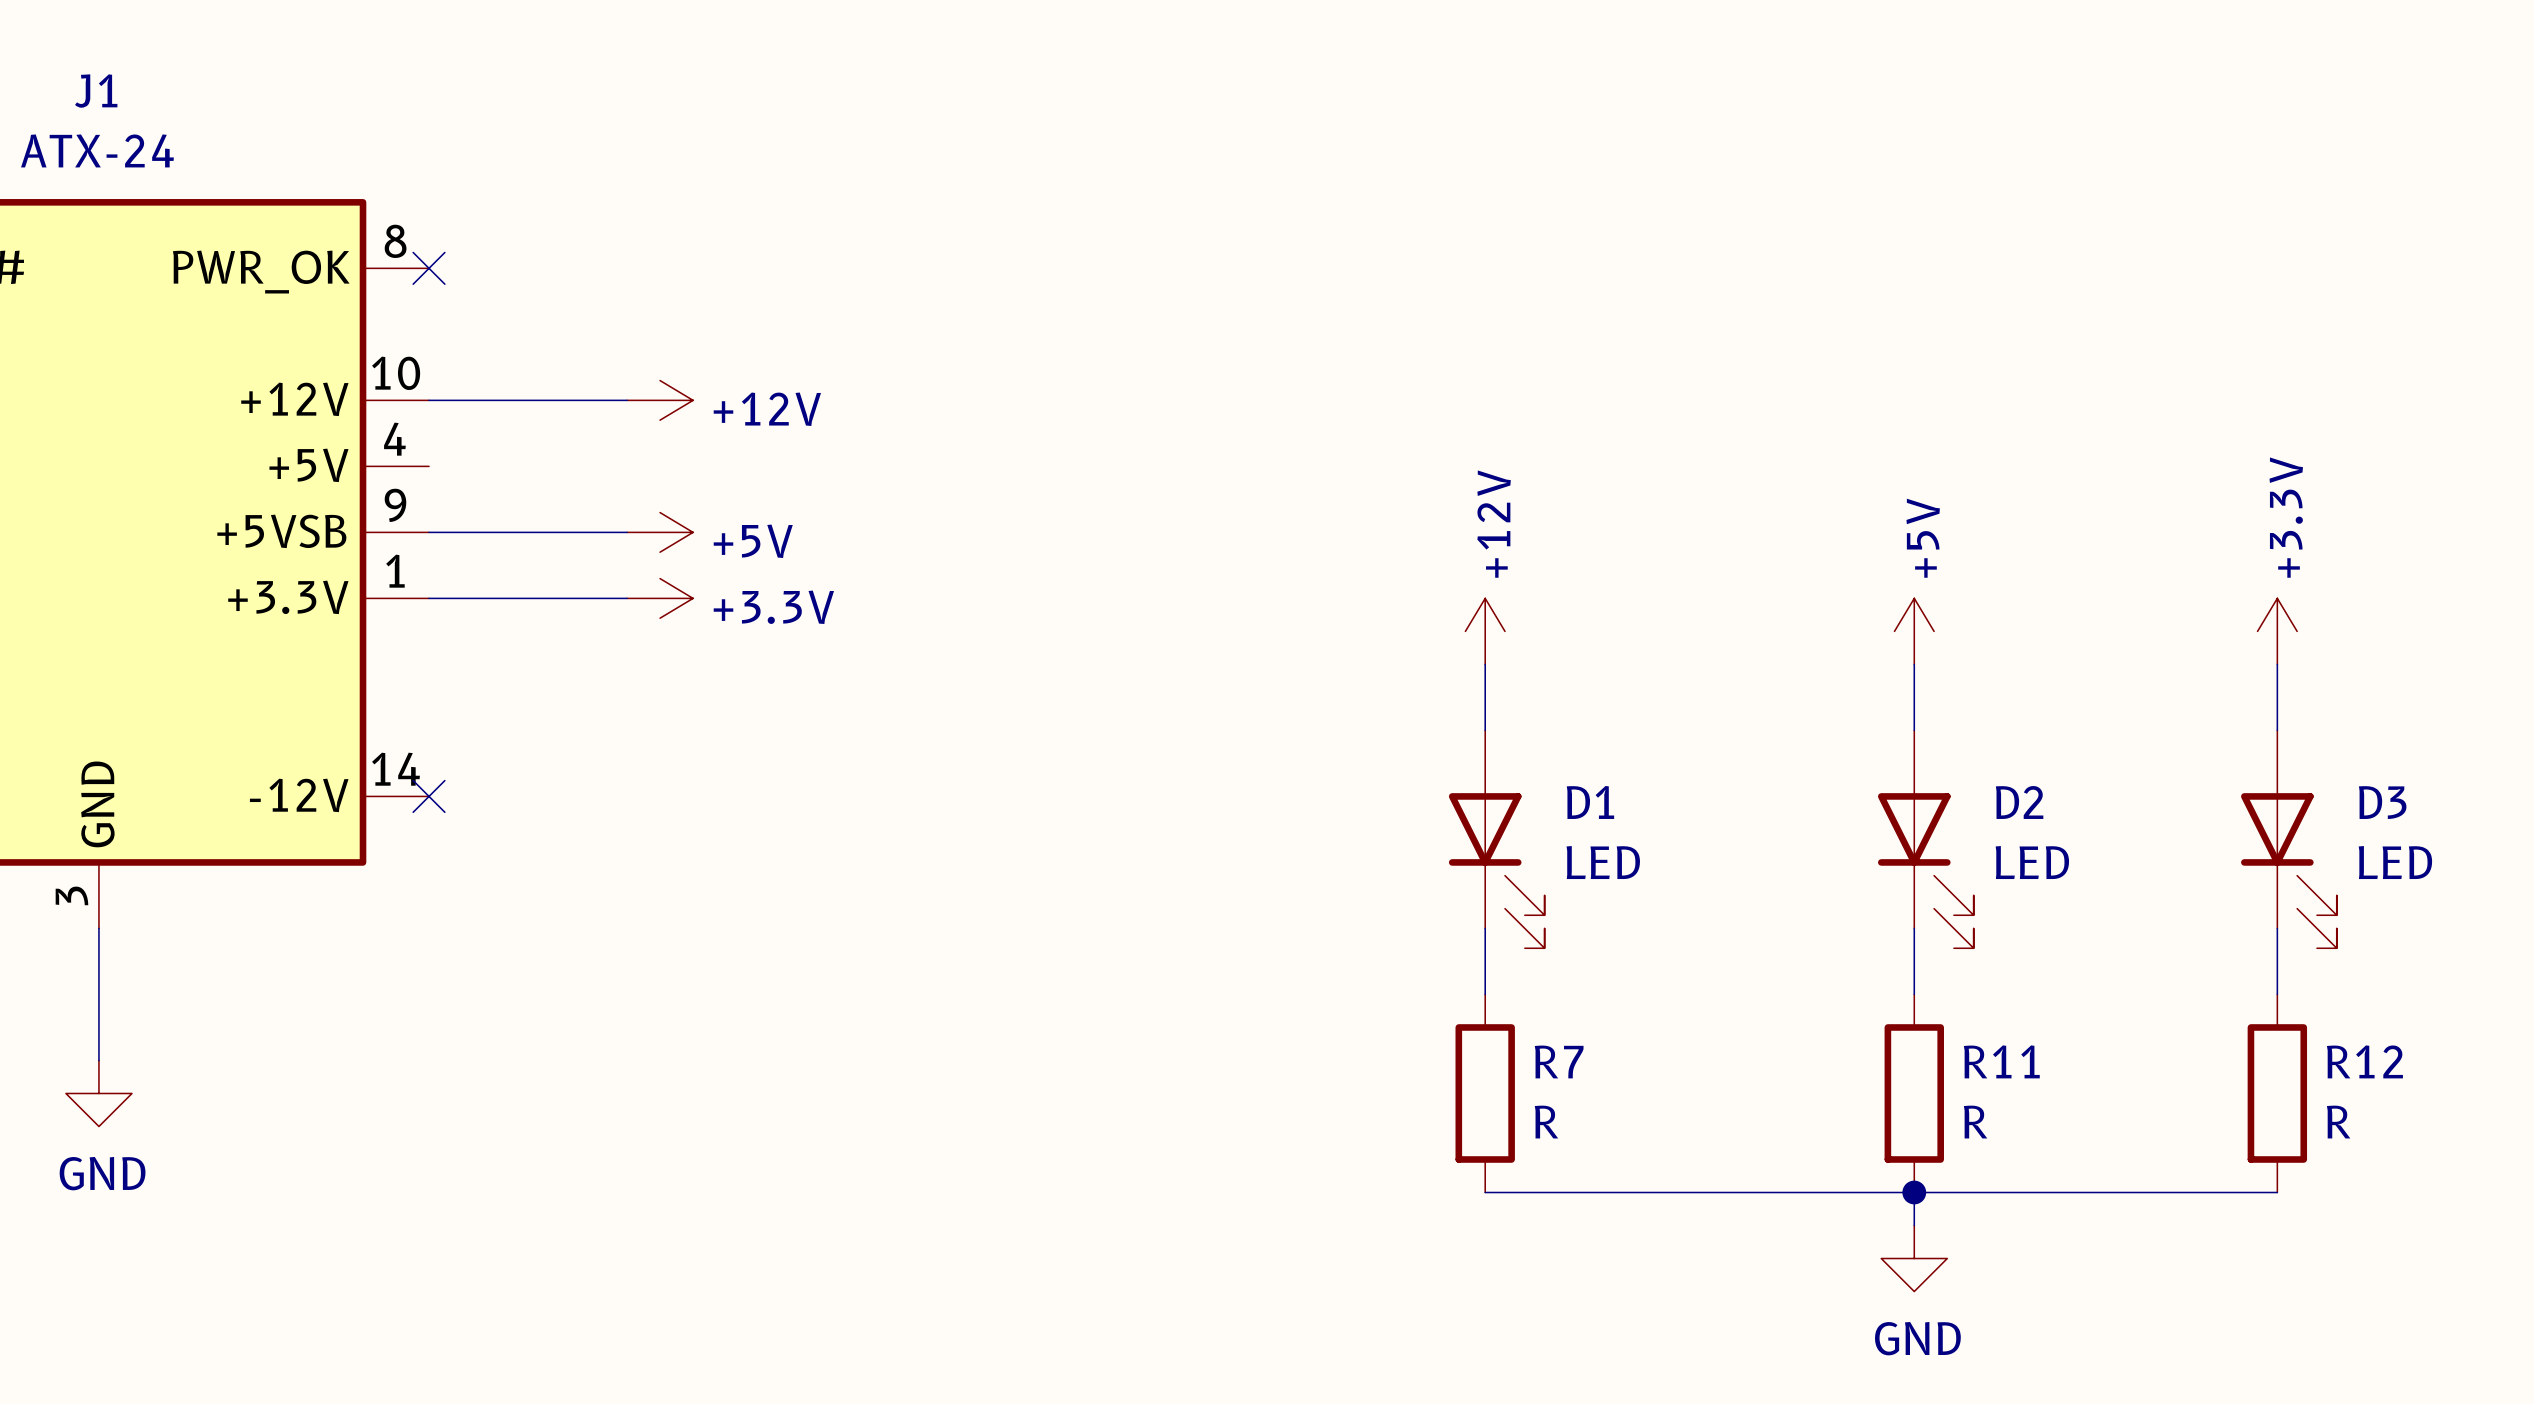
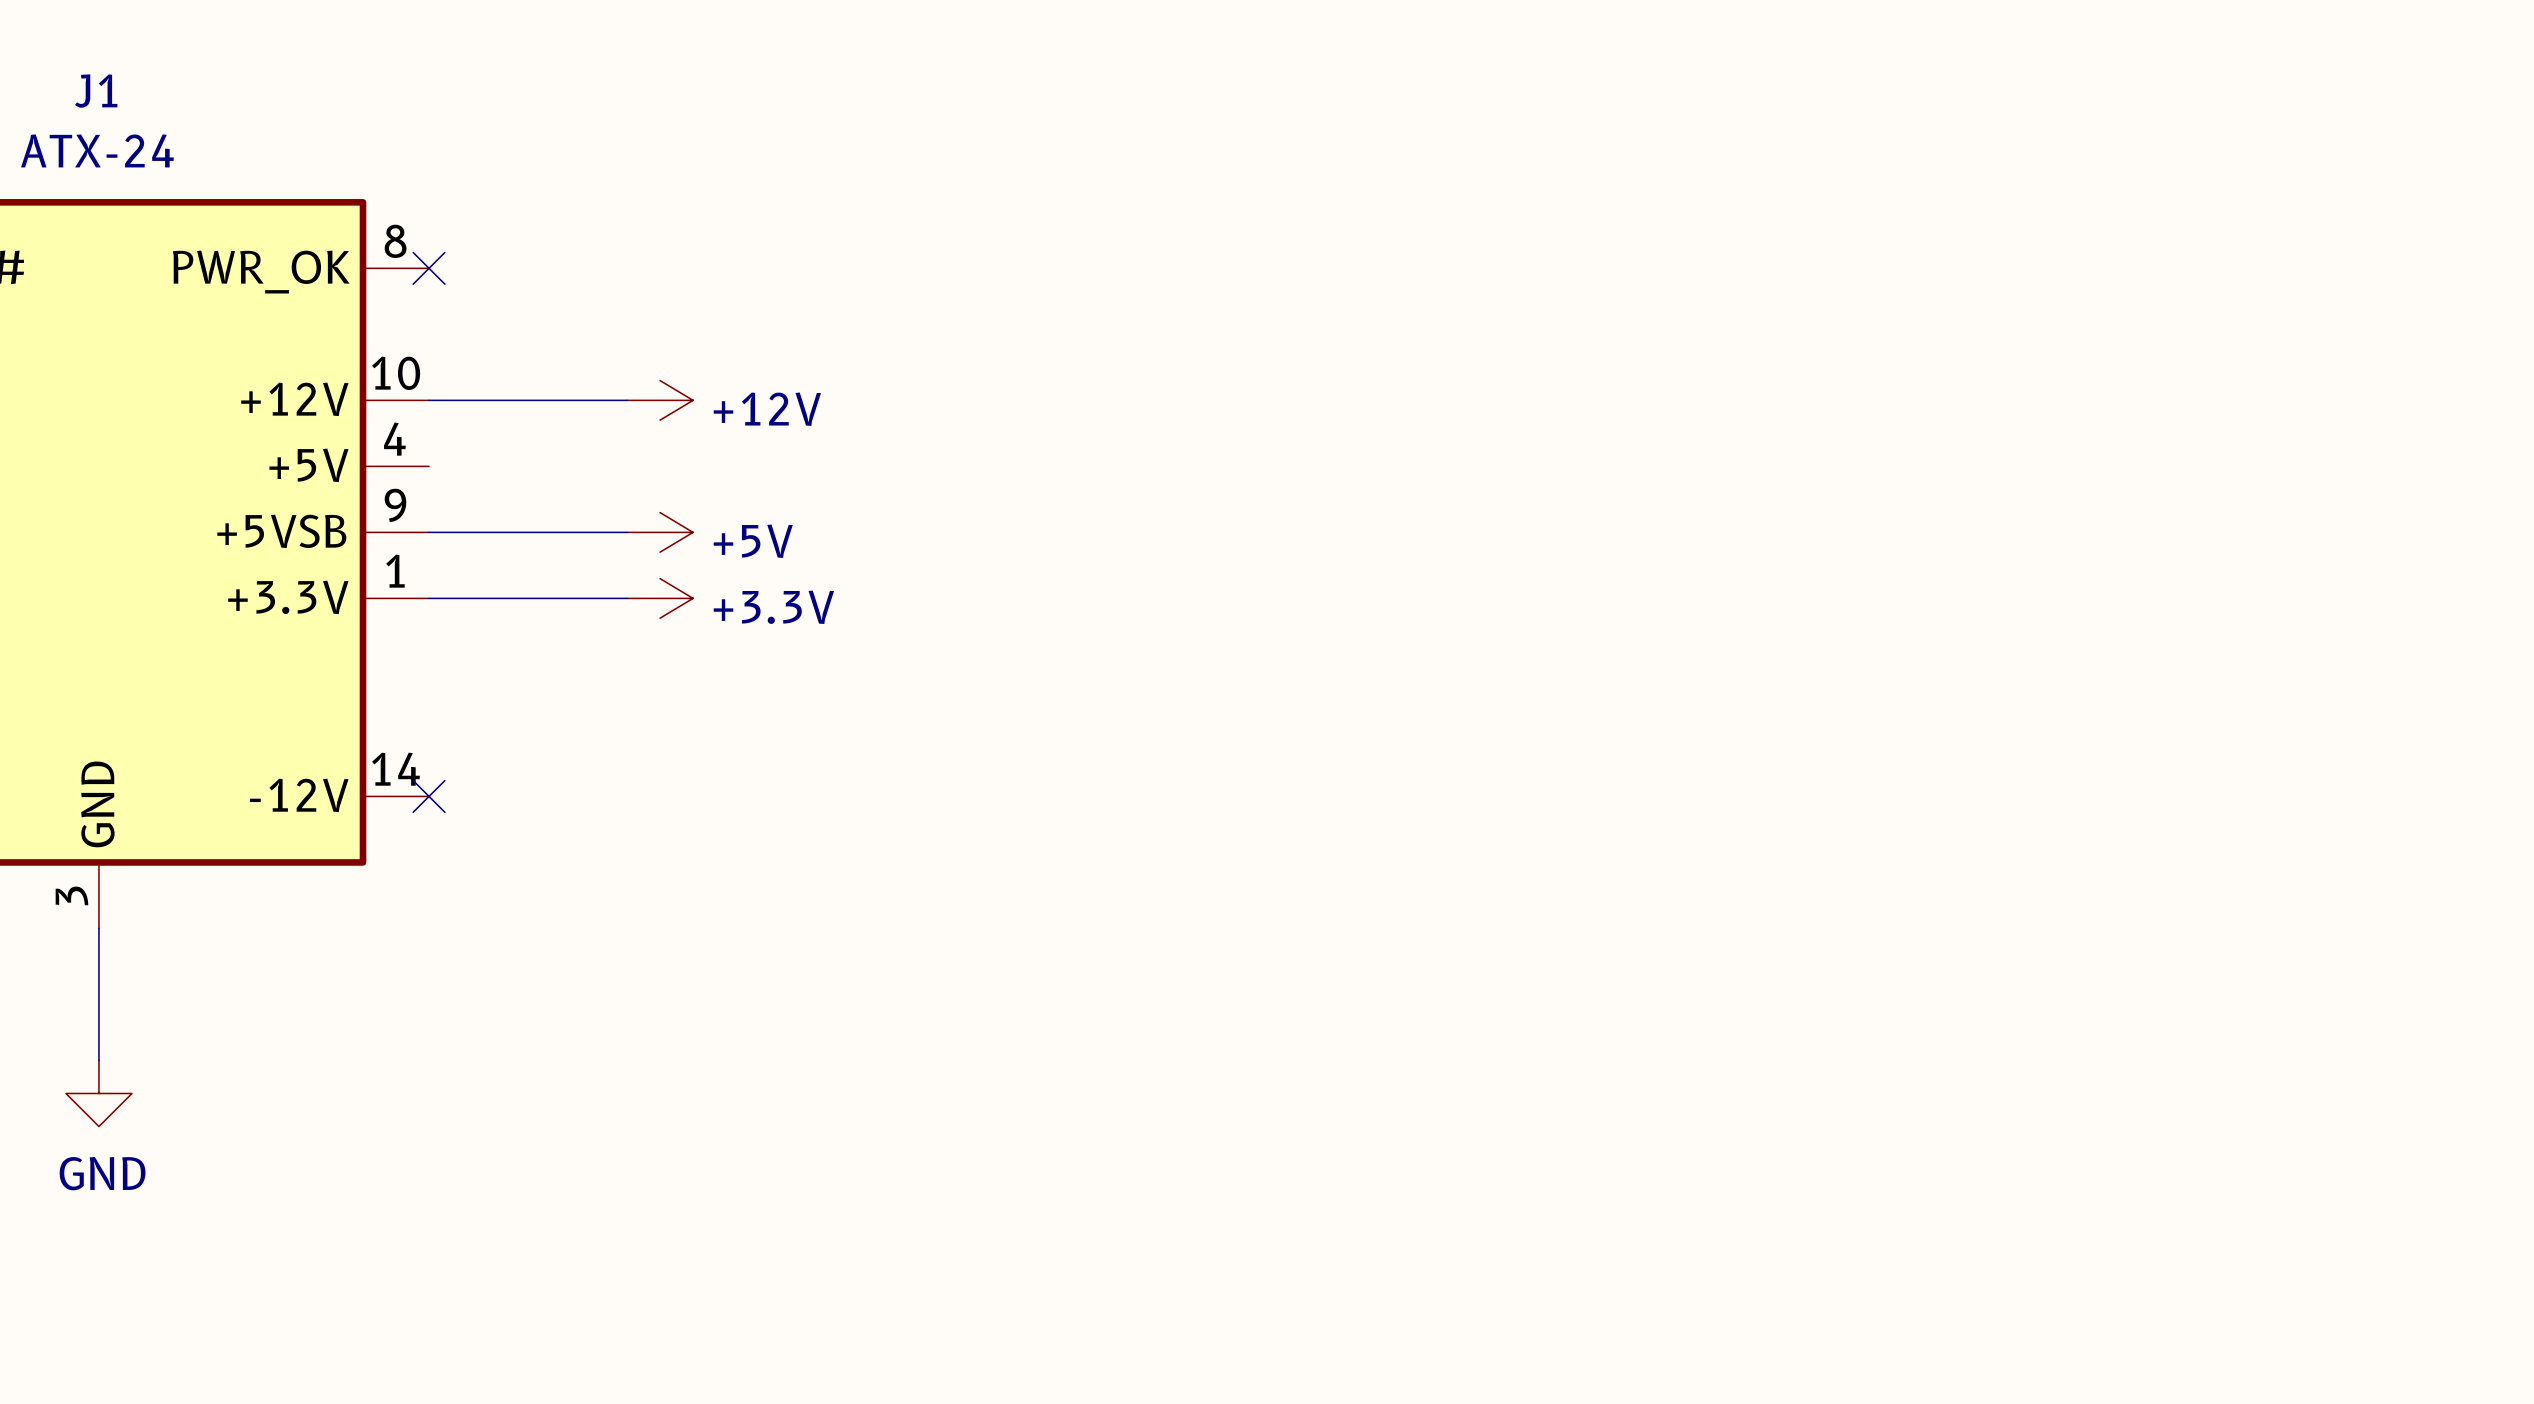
power symbol: +12V (1485, 631) -> none
power symbol: +5V (1914, 631) -> none
power symbol: +3.3V (2277, 631) -> none
wire: (1485, 664) (1485, 730) -> none
wire: (1914, 664) (1914, 730) -> none
wire: (2277, 664) (2277, 730) -> none
D1: LED (1496, 839) -> none
D2: LED (1925, 839) -> none
D3: LED (2288, 839) -> none
wire: (1485, 928) (1485, 994) -> none
wire: (1914, 928) (1914, 994) -> none
wire: (2277, 928) (2277, 994) -> none
R7: R (1485, 1093) -> none
R11: R (1914, 1093) -> none
R12: R (2277, 1093) -> none
wire: (1485, 1192) (2277, 1192) -> none
wire: (1914, 1192) (1914, 1225) -> none
junction: (1914, 1192) -> none
power symbol: GND (1914, 1258) -> none

